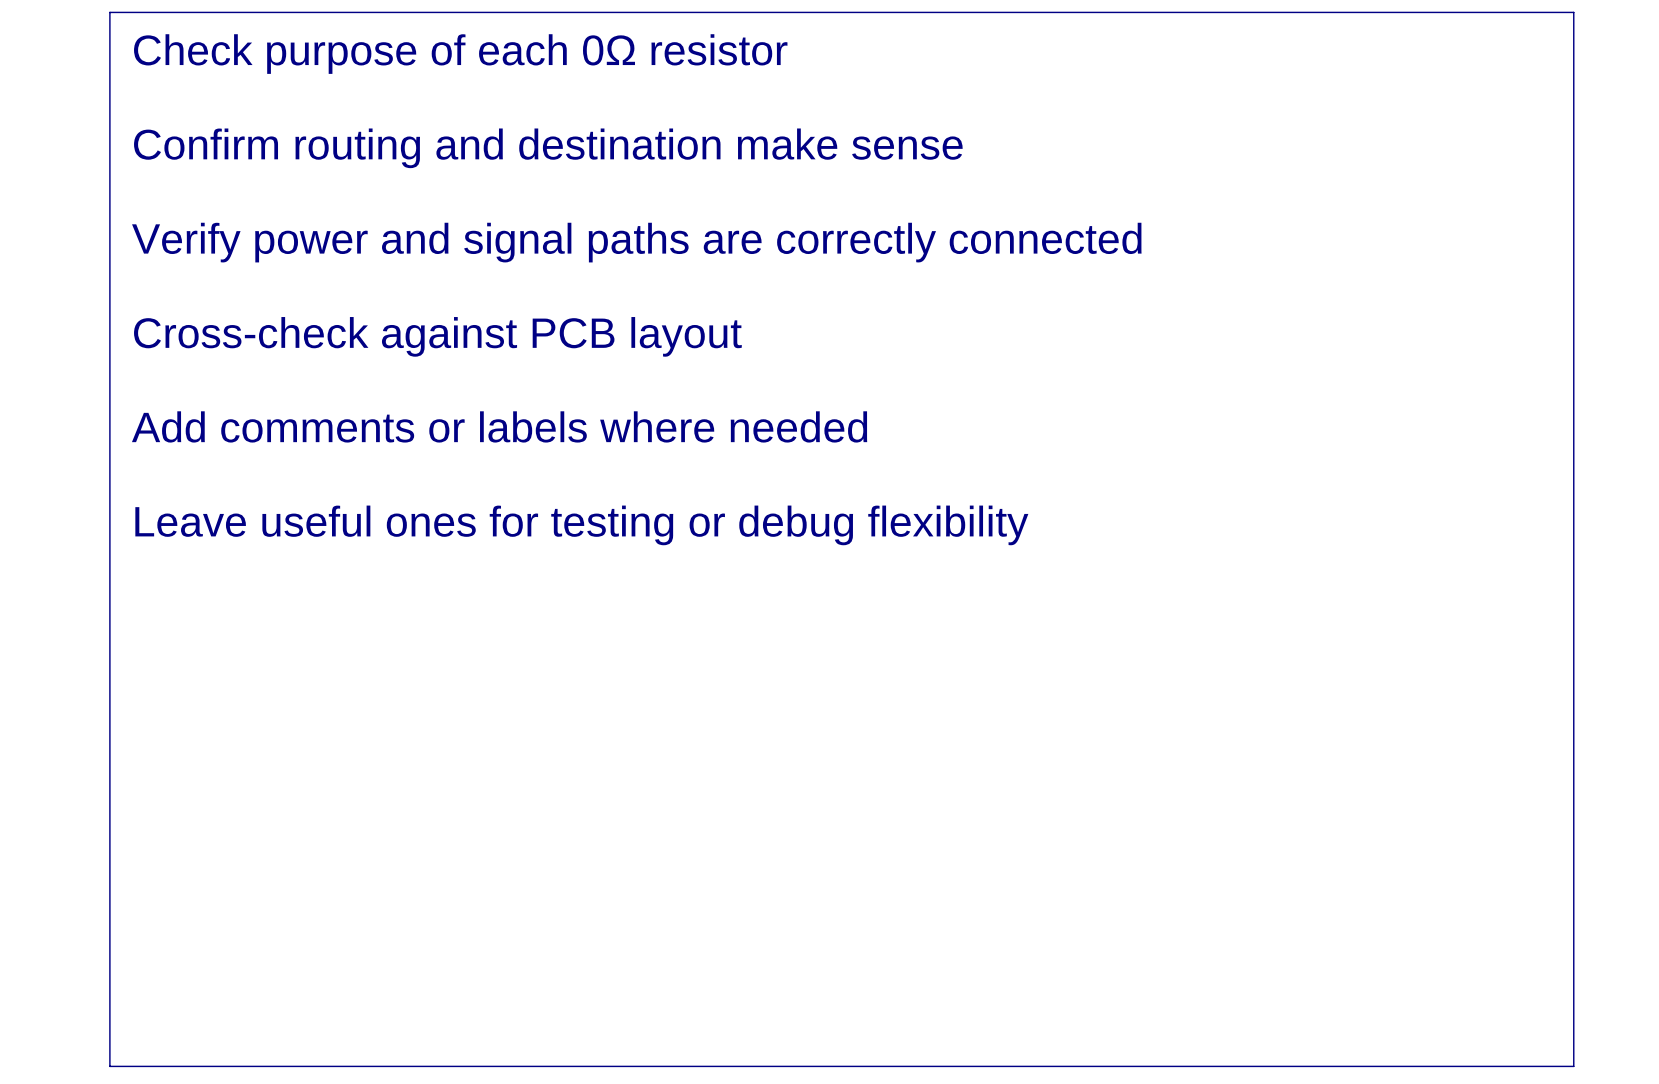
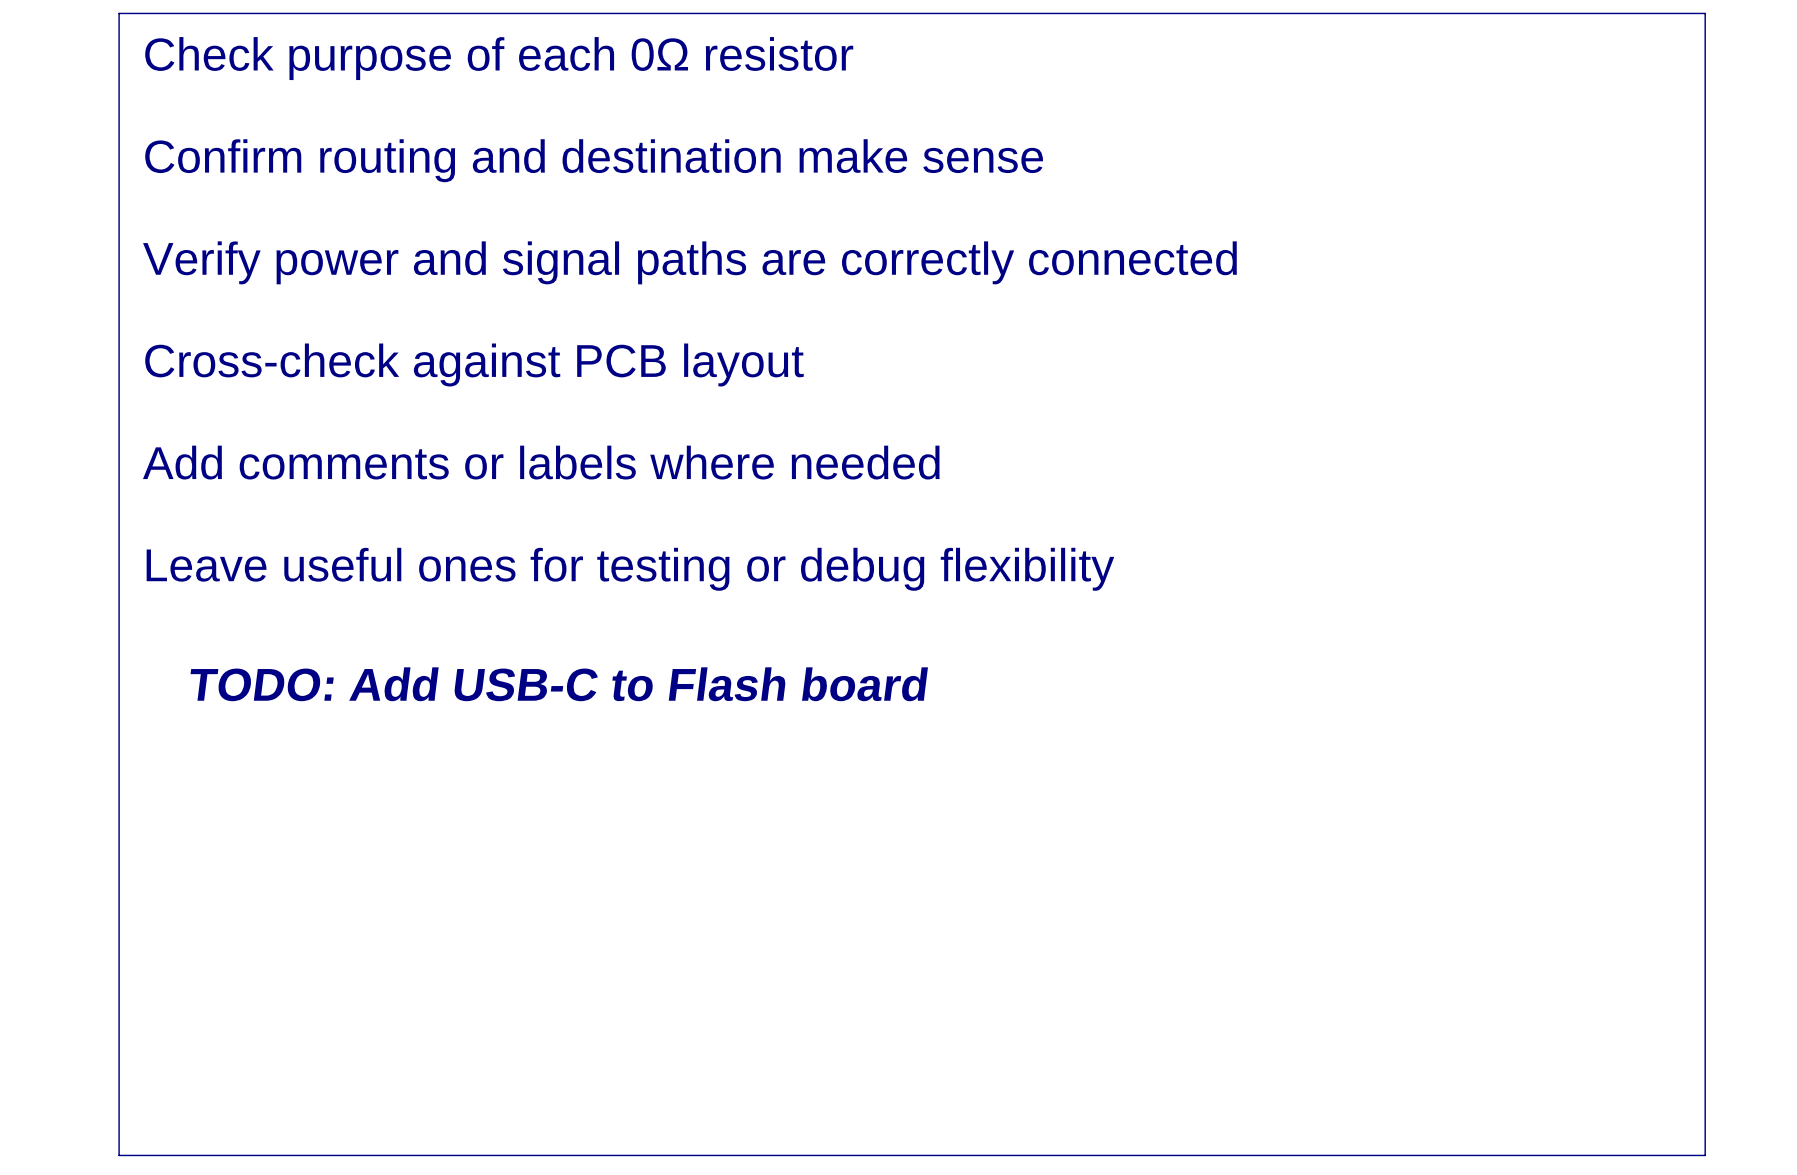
text: none -> TODO: Add USB-C to Flash board (559, 684)

